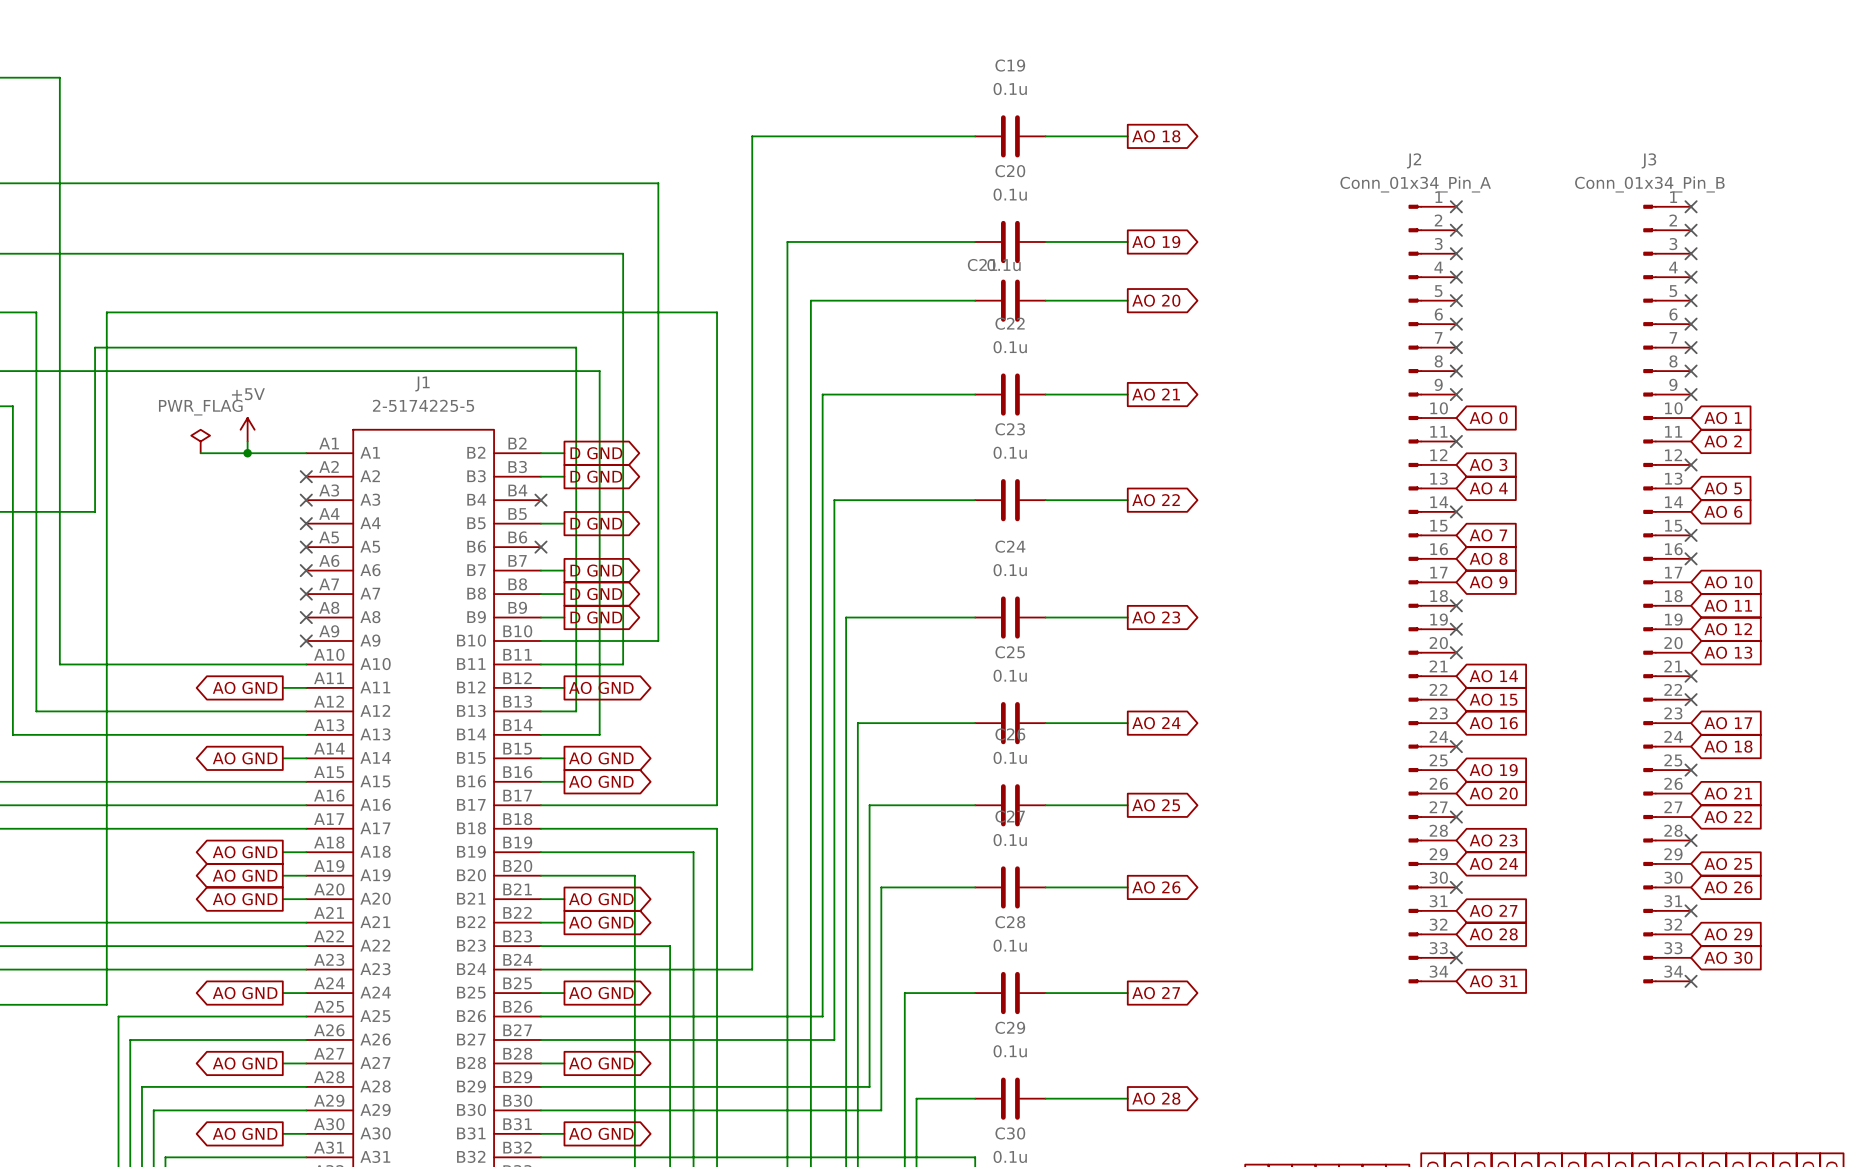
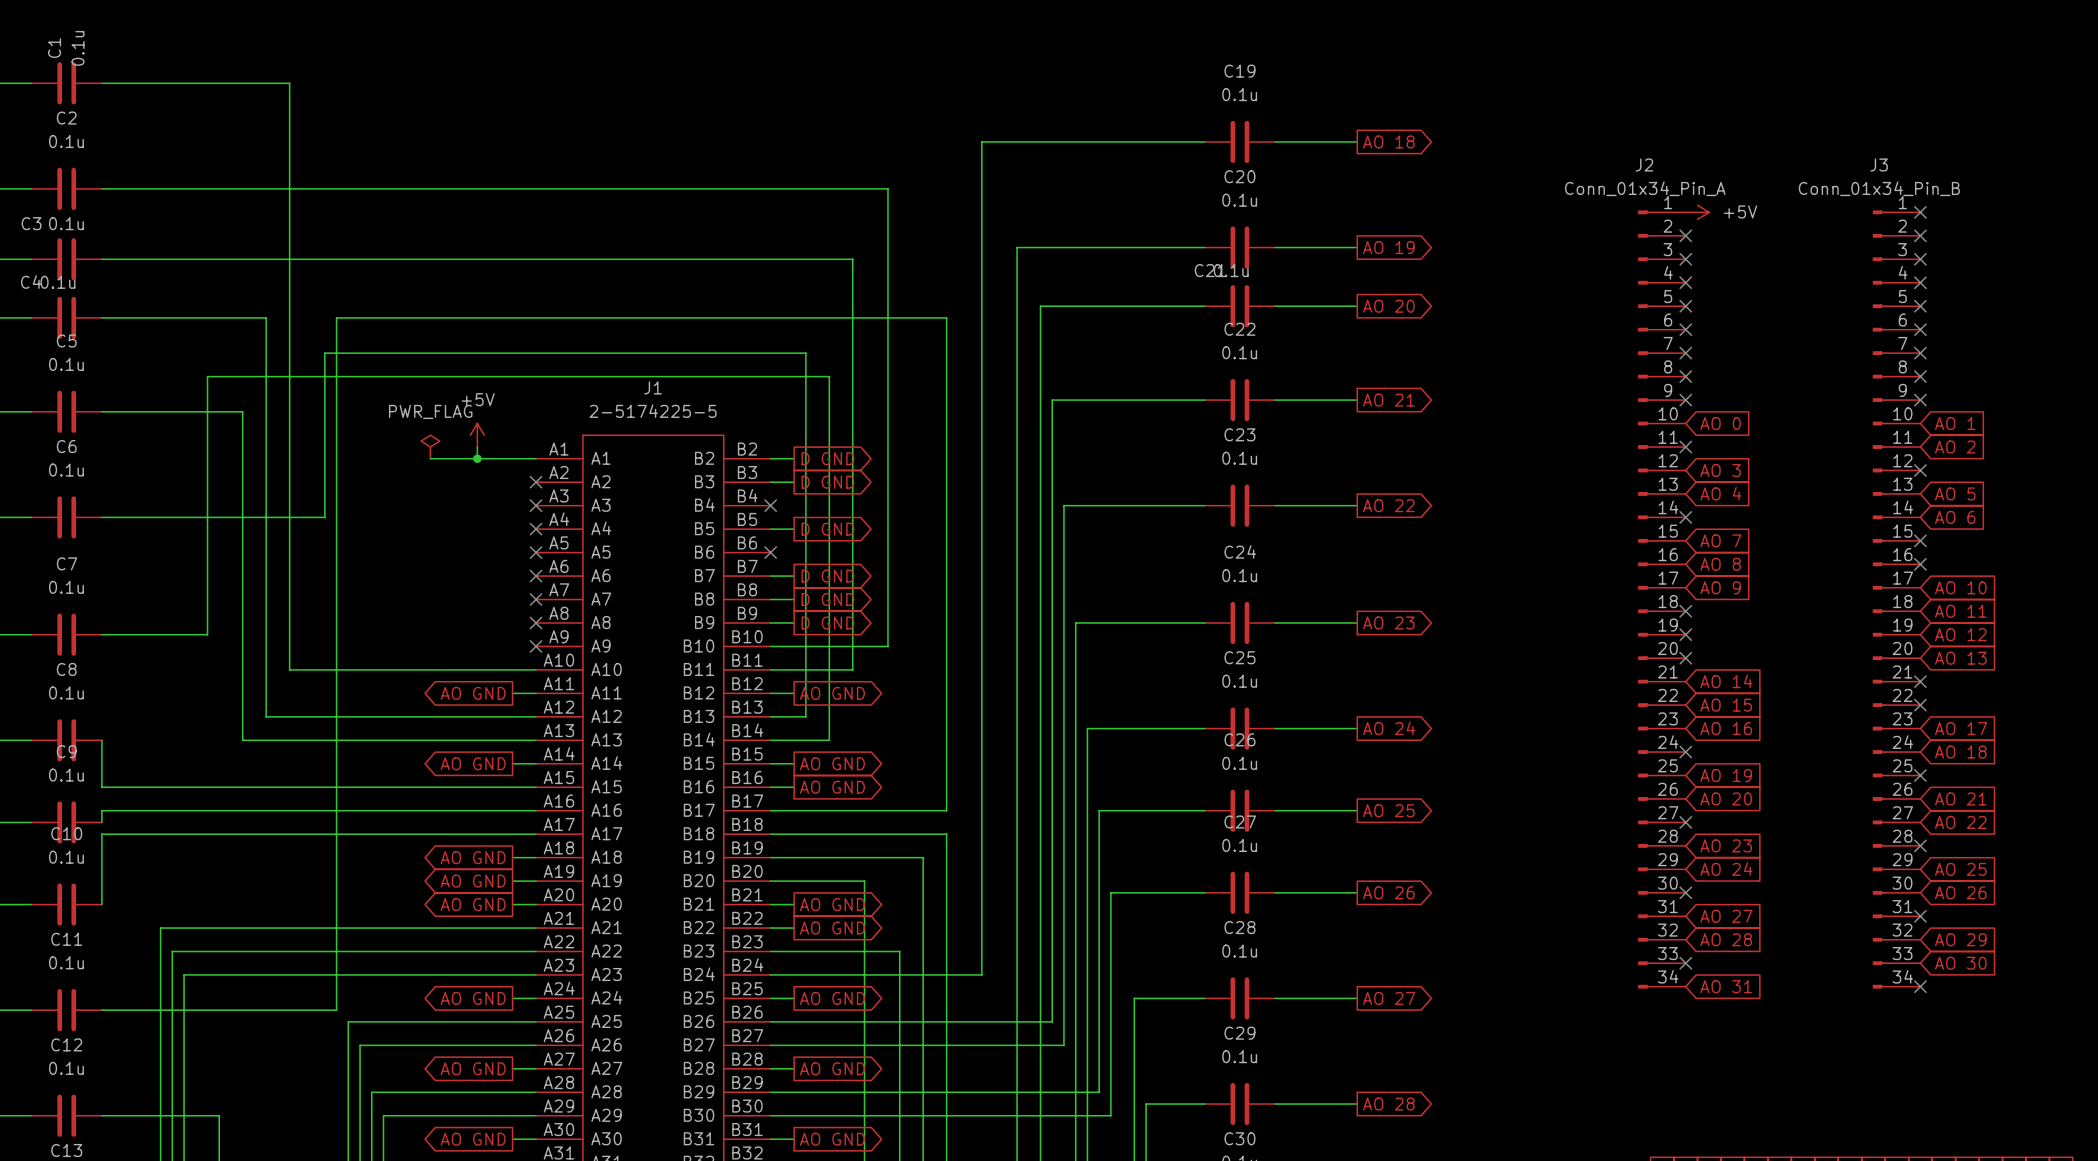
no-connect mark: (1456, 206) -> none
power symbol: none -> +5V (1697, 212)

